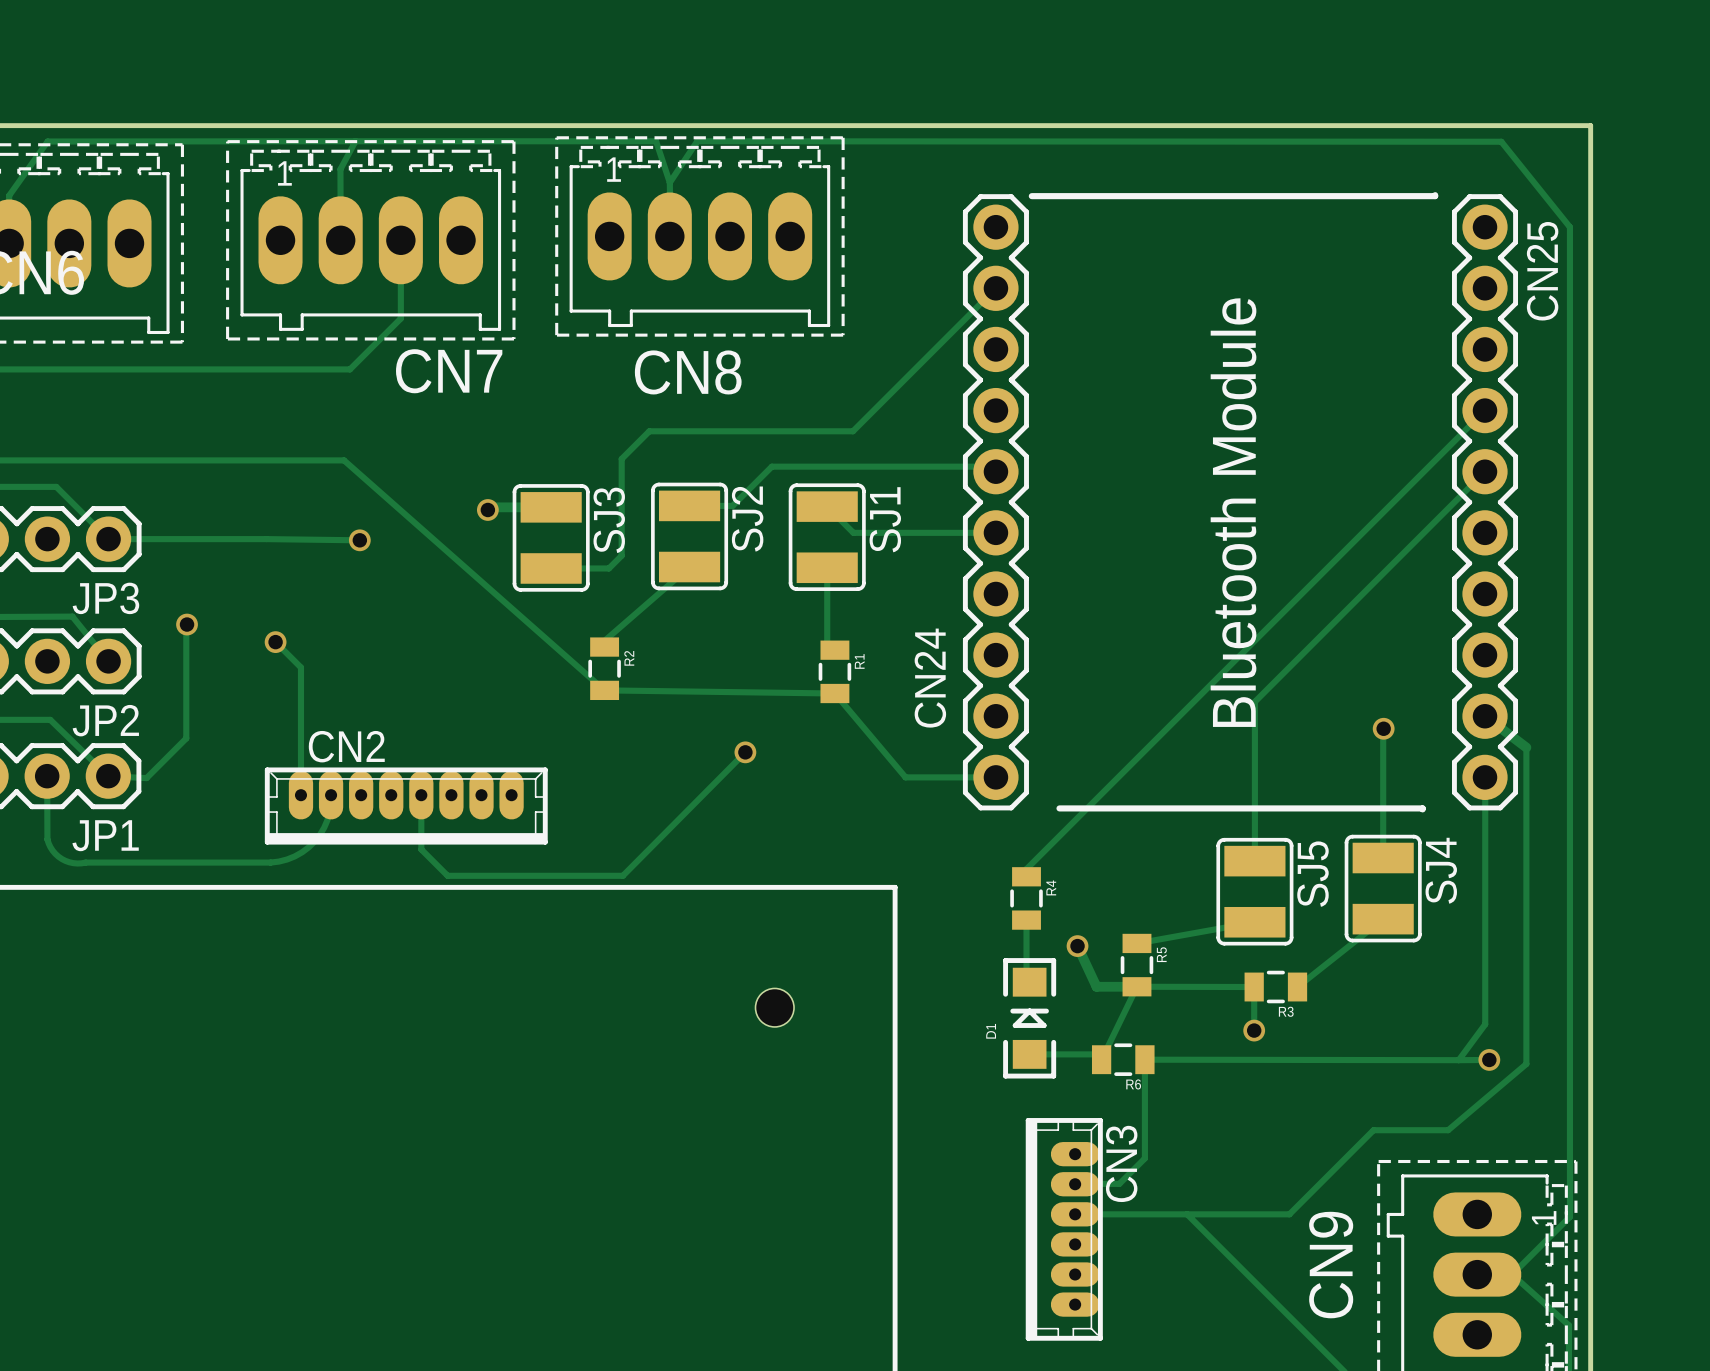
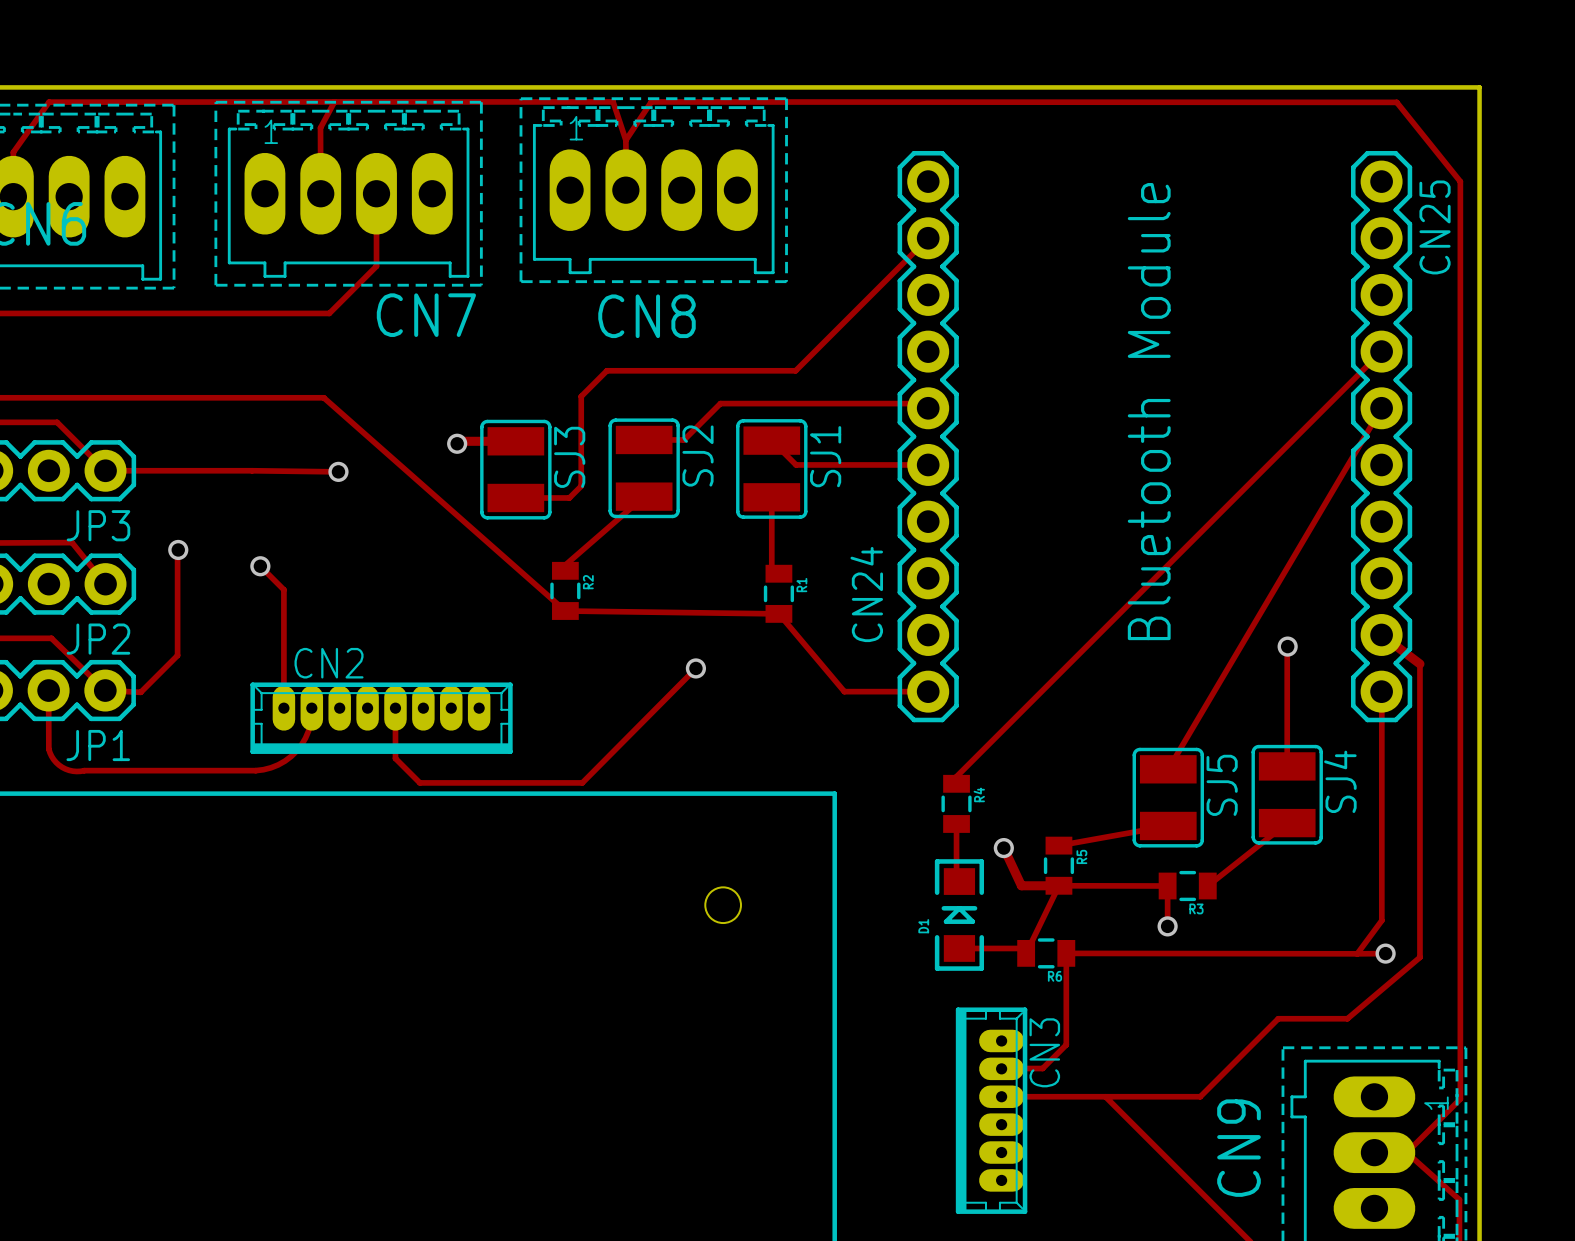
line: (1435, 195) (1031, 196) -> none
track: (1485, 471) (1254, 701) (1254, 861) -> (1381, 408) (1168, 769)
line: (1059, 808) (1422, 809) -> none

